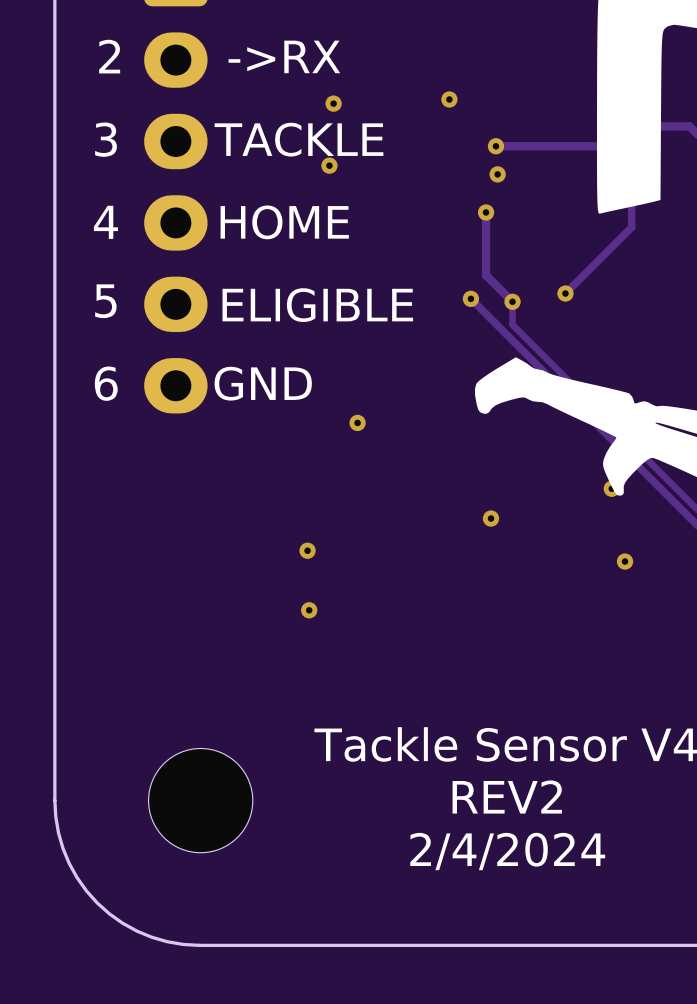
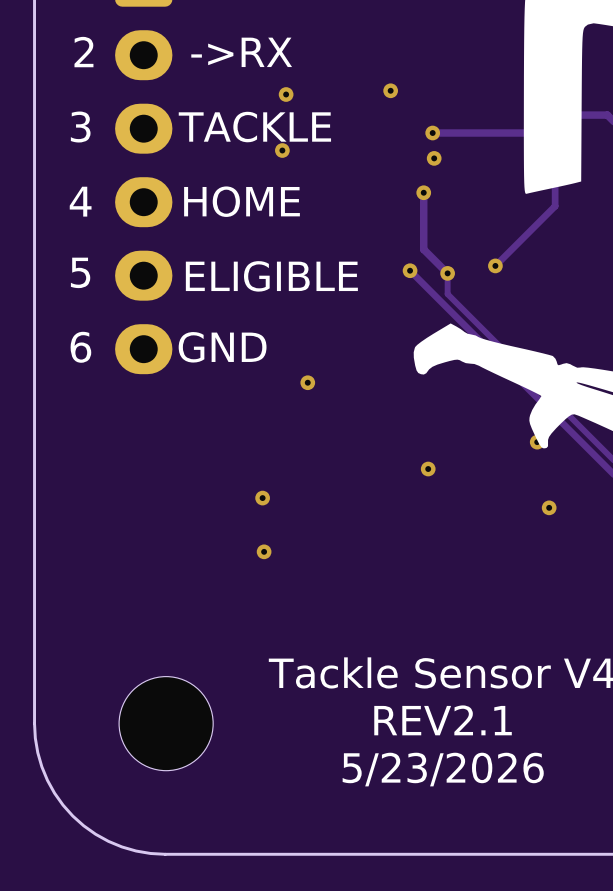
text: REV2 (507, 796) -> REV2.1 (443, 720)
text: 2/4/2024 (507, 851) -> 5/23/2026 (443, 769)

